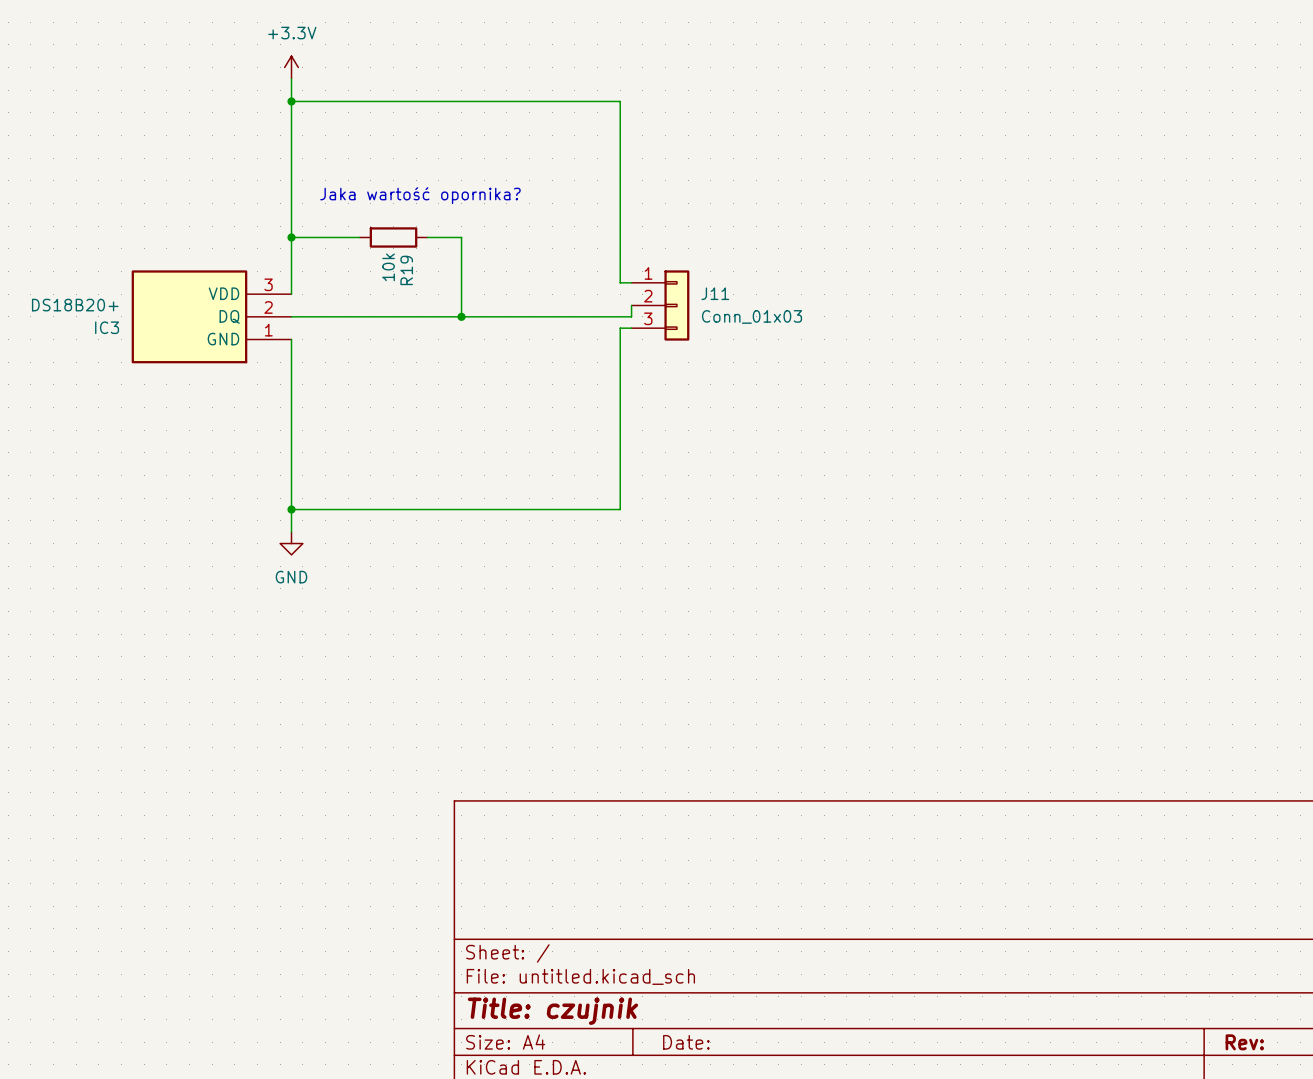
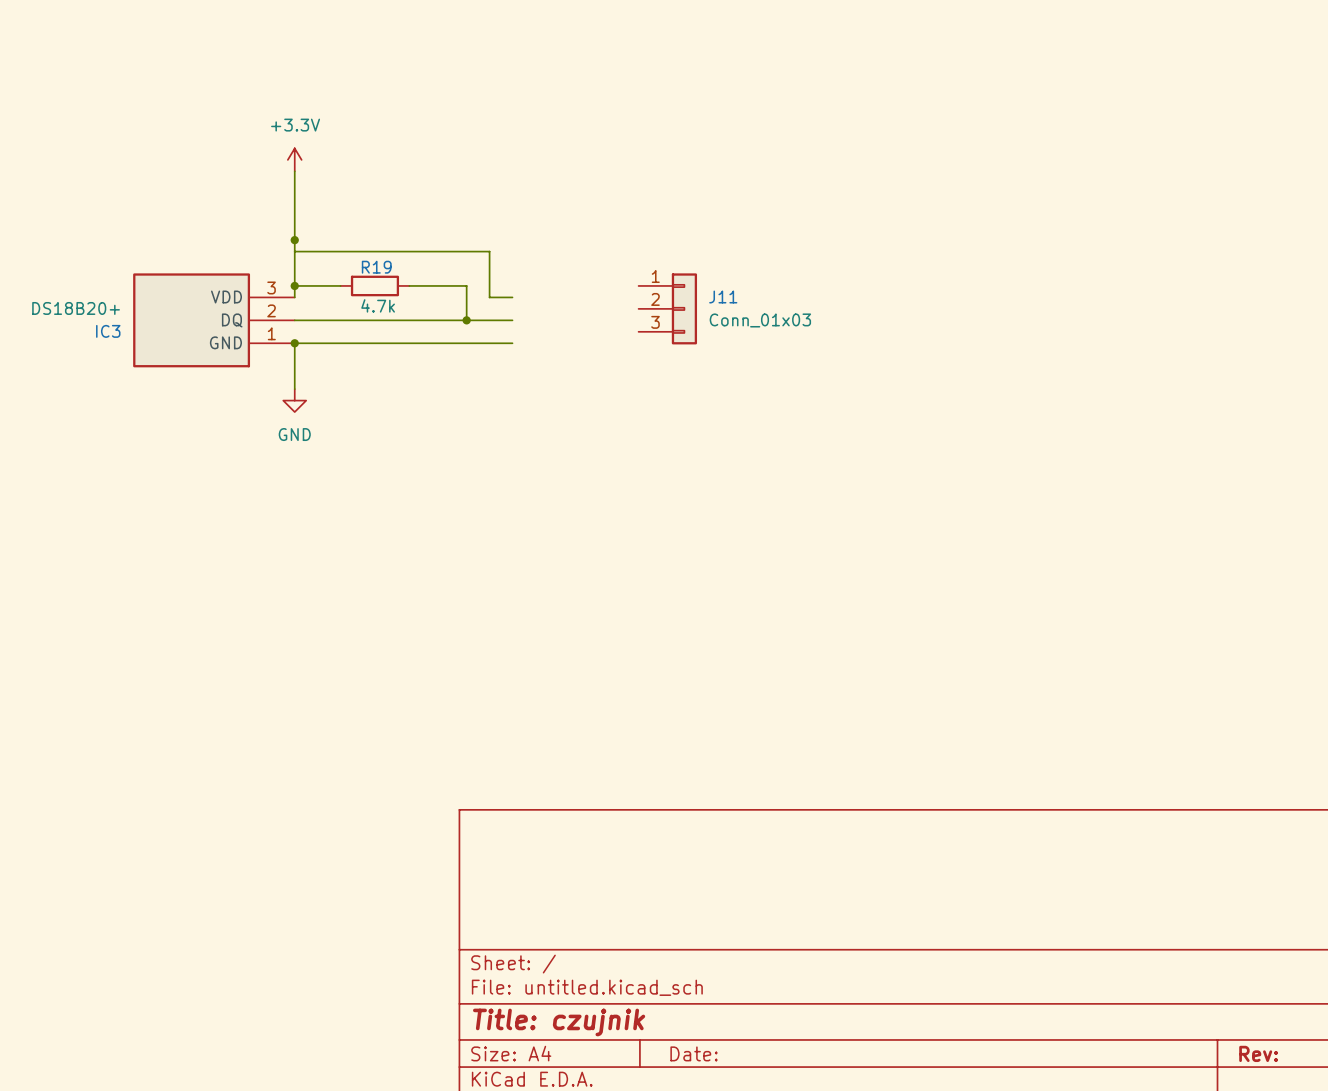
power symbol position: +3.3V (291, 67) -> +3.3V (294, 159)
wire: (291, 78) (291, 169) -> none
wire: (291, 101) (620, 101) (620, 282) (631, 282) -> none
junction: (291, 101) -> none
text: Jaka wartość opornika? (420, 195) -> none
wire: (291, 237) (359, 237) -> none
R19 position: (393, 237) -> (374, 285)
wire: (427, 237) (461, 237) (461, 282) -> (409, 285) (466, 285)
wire: none -> (294, 251) (489, 251) (489, 297) (512, 297)
R19 value: 10k (388, 267) -> 4.7k (378, 305)
R19 name rotation: 0° (406, 270) -> 90° clockwise (376, 267)
wire: none -> (294, 285) (340, 285)
junction: none -> (294, 285)
wire: (631, 305) (631, 316) (506, 316) -> none
wire: (631, 328) (620, 328) (620, 509) (291, 509) -> none
wire: none -> (294, 343) (512, 343)
junction: none -> (294, 343)
wire: (291, 384) (291, 532) -> none
junction: (291, 509) -> none
power symbol position: GND (291, 543) -> GND (294, 400)

